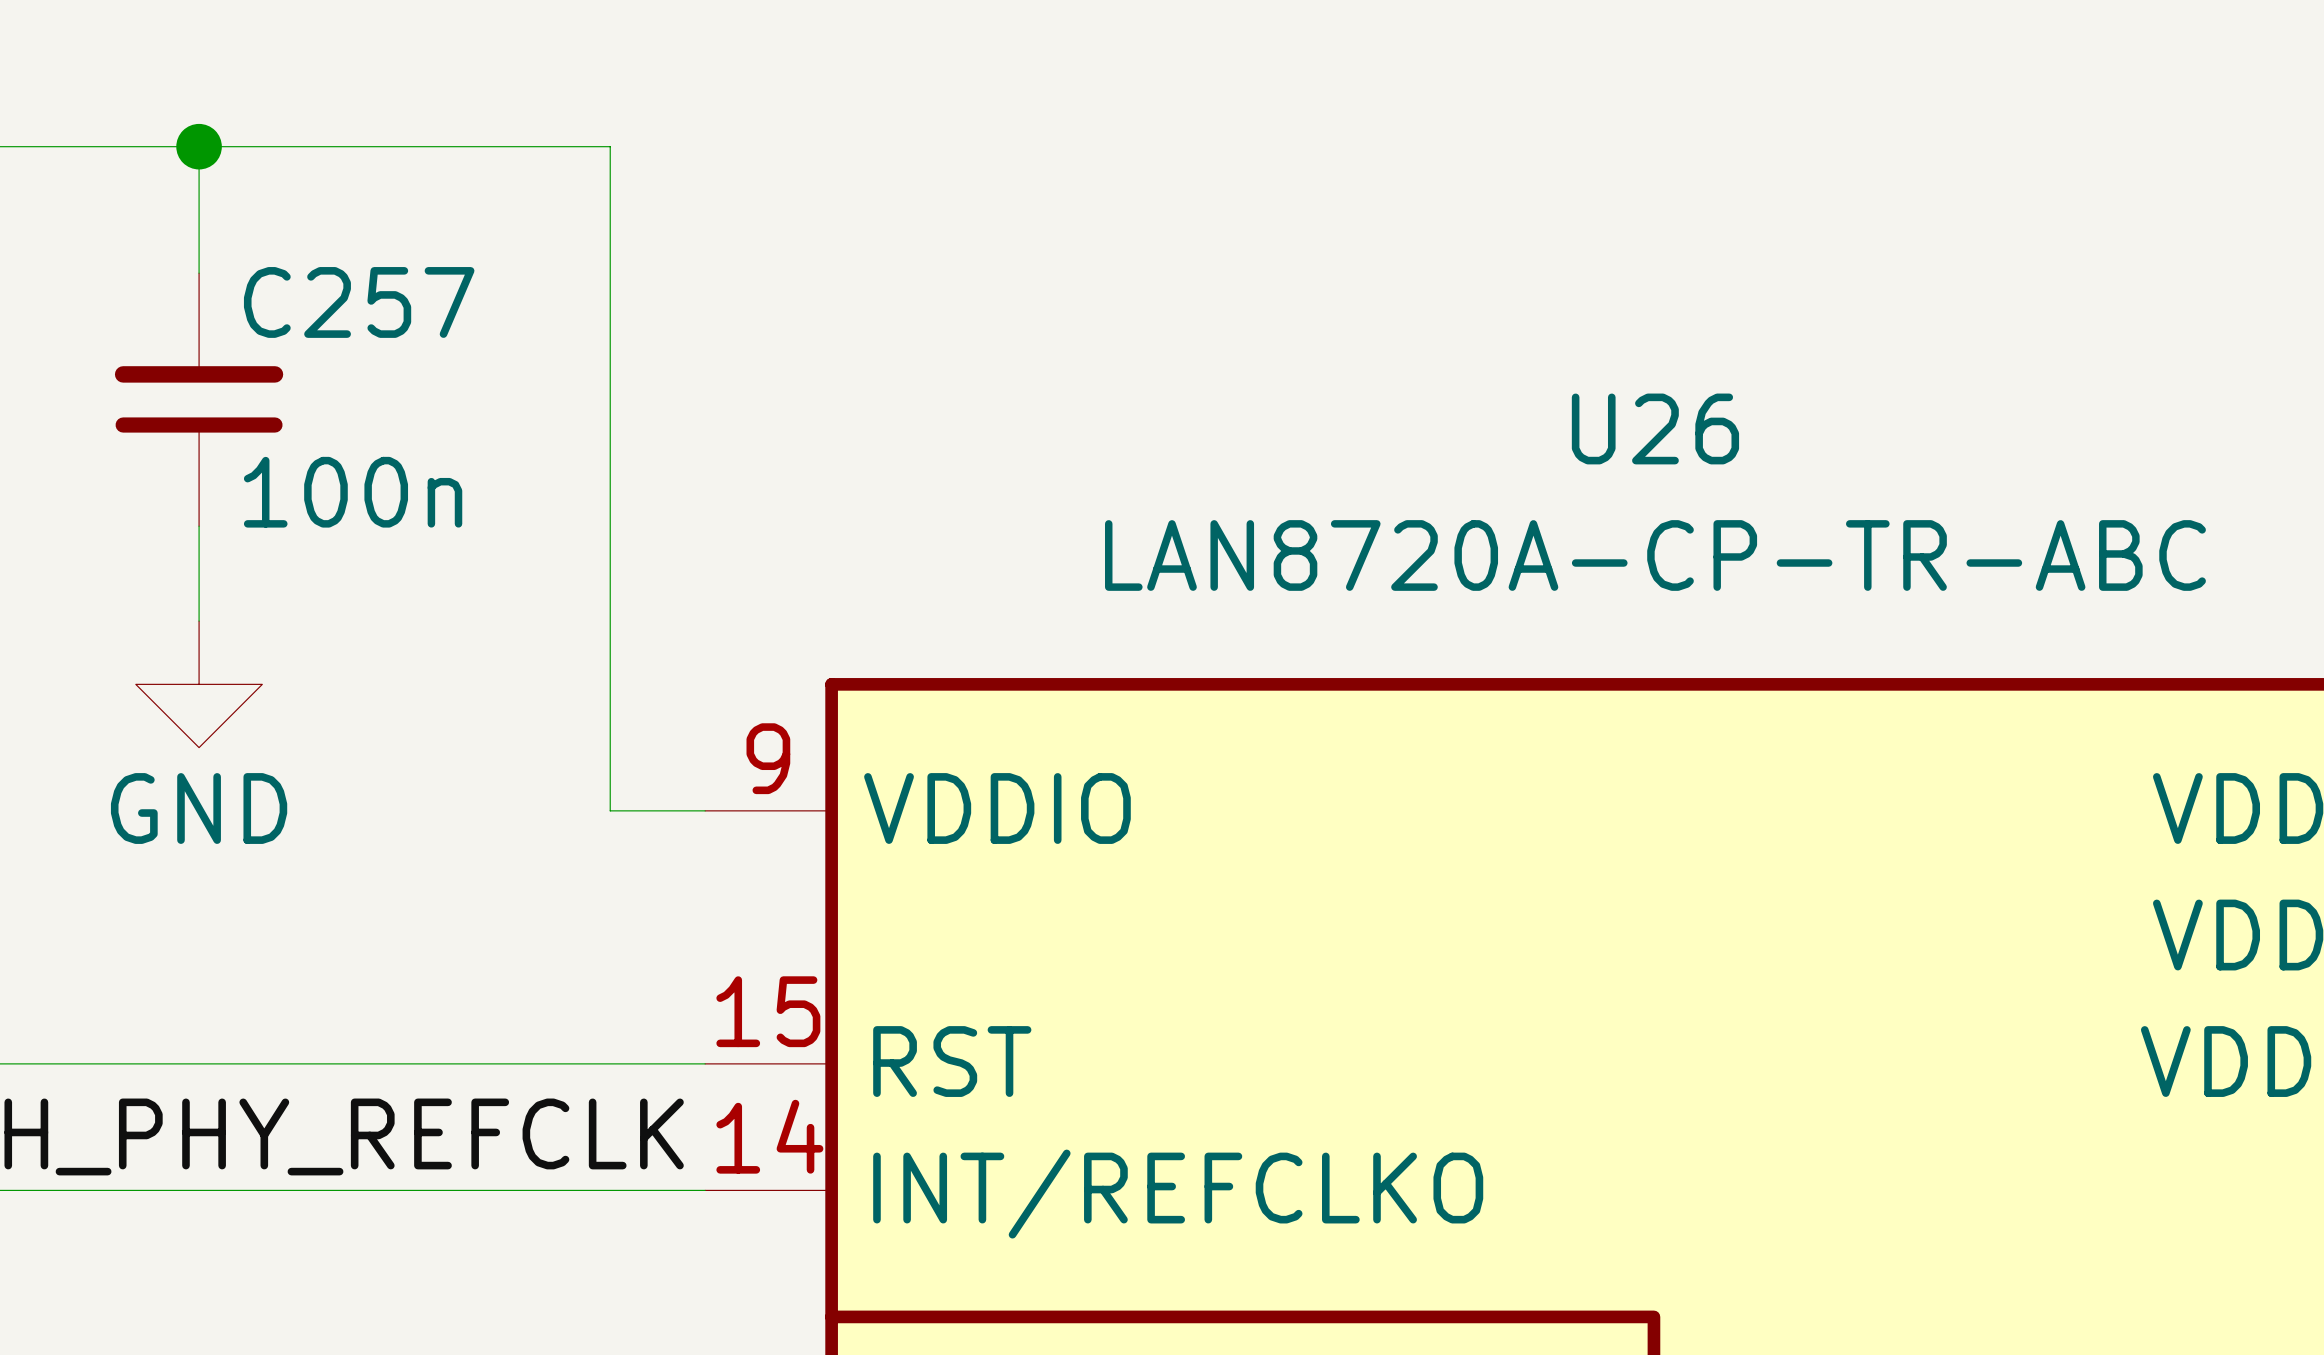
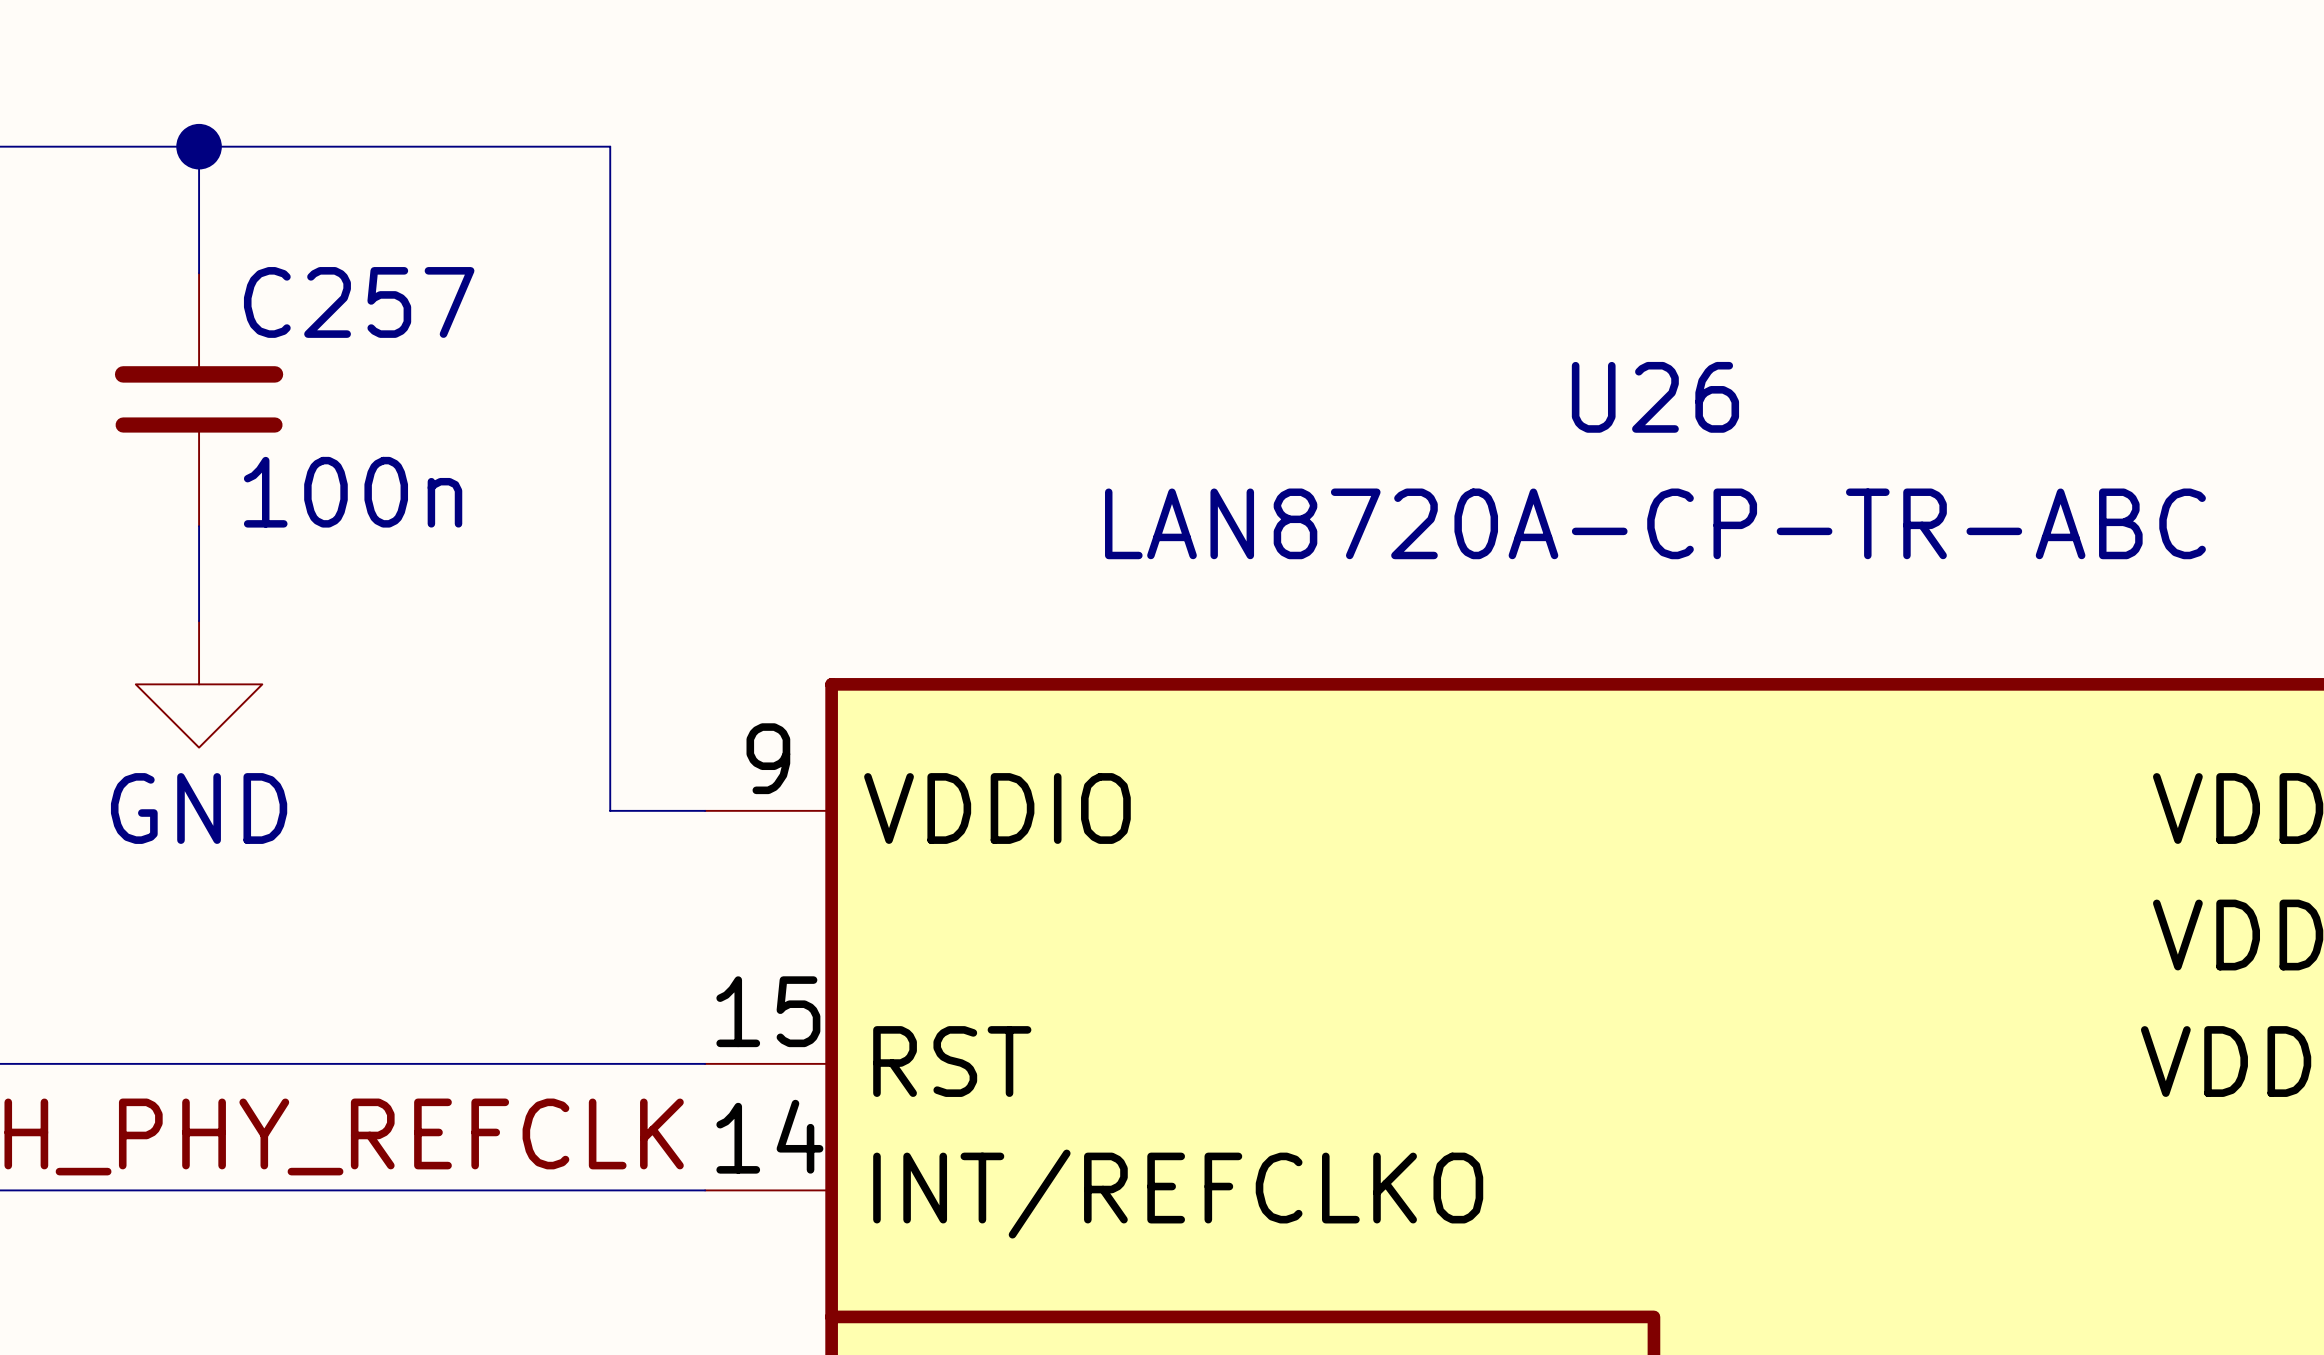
U26 name position: U26 (1655, 428) -> U26 (1655, 397)
U26 value position: LAN8720A-CP-TR-ABC (1655, 555) -> LAN8720A-CP-TR-ABC (1655, 523)

